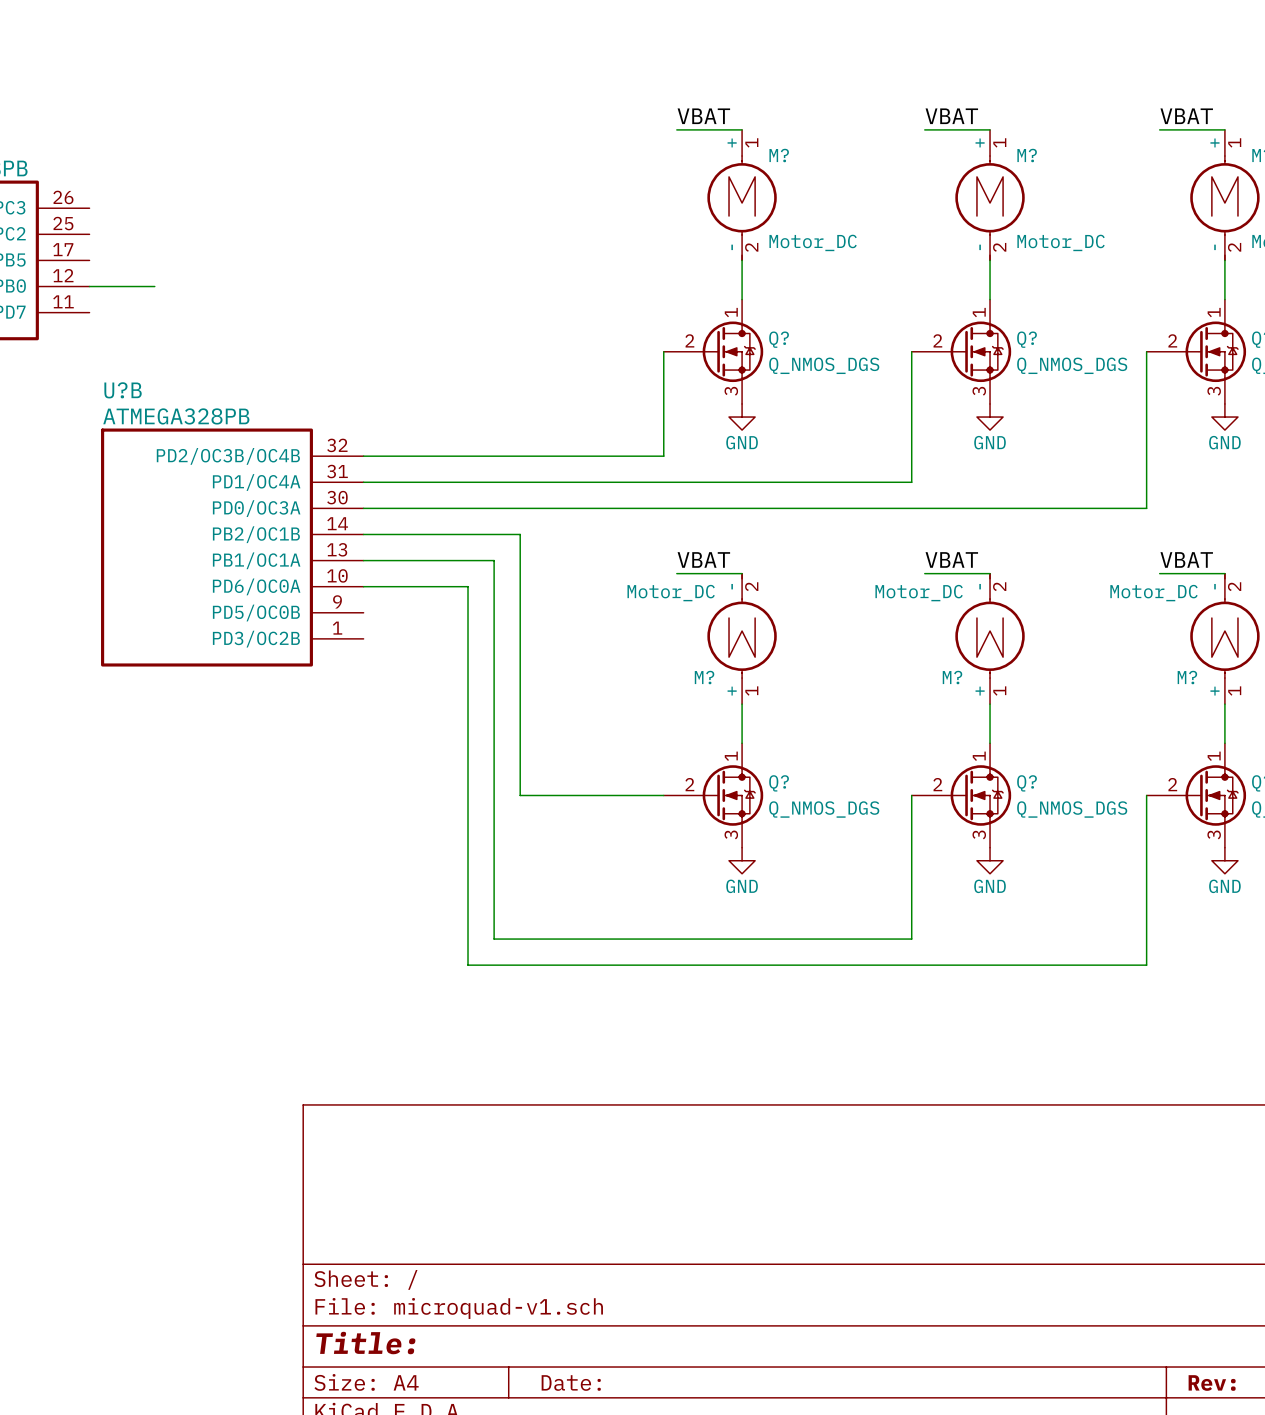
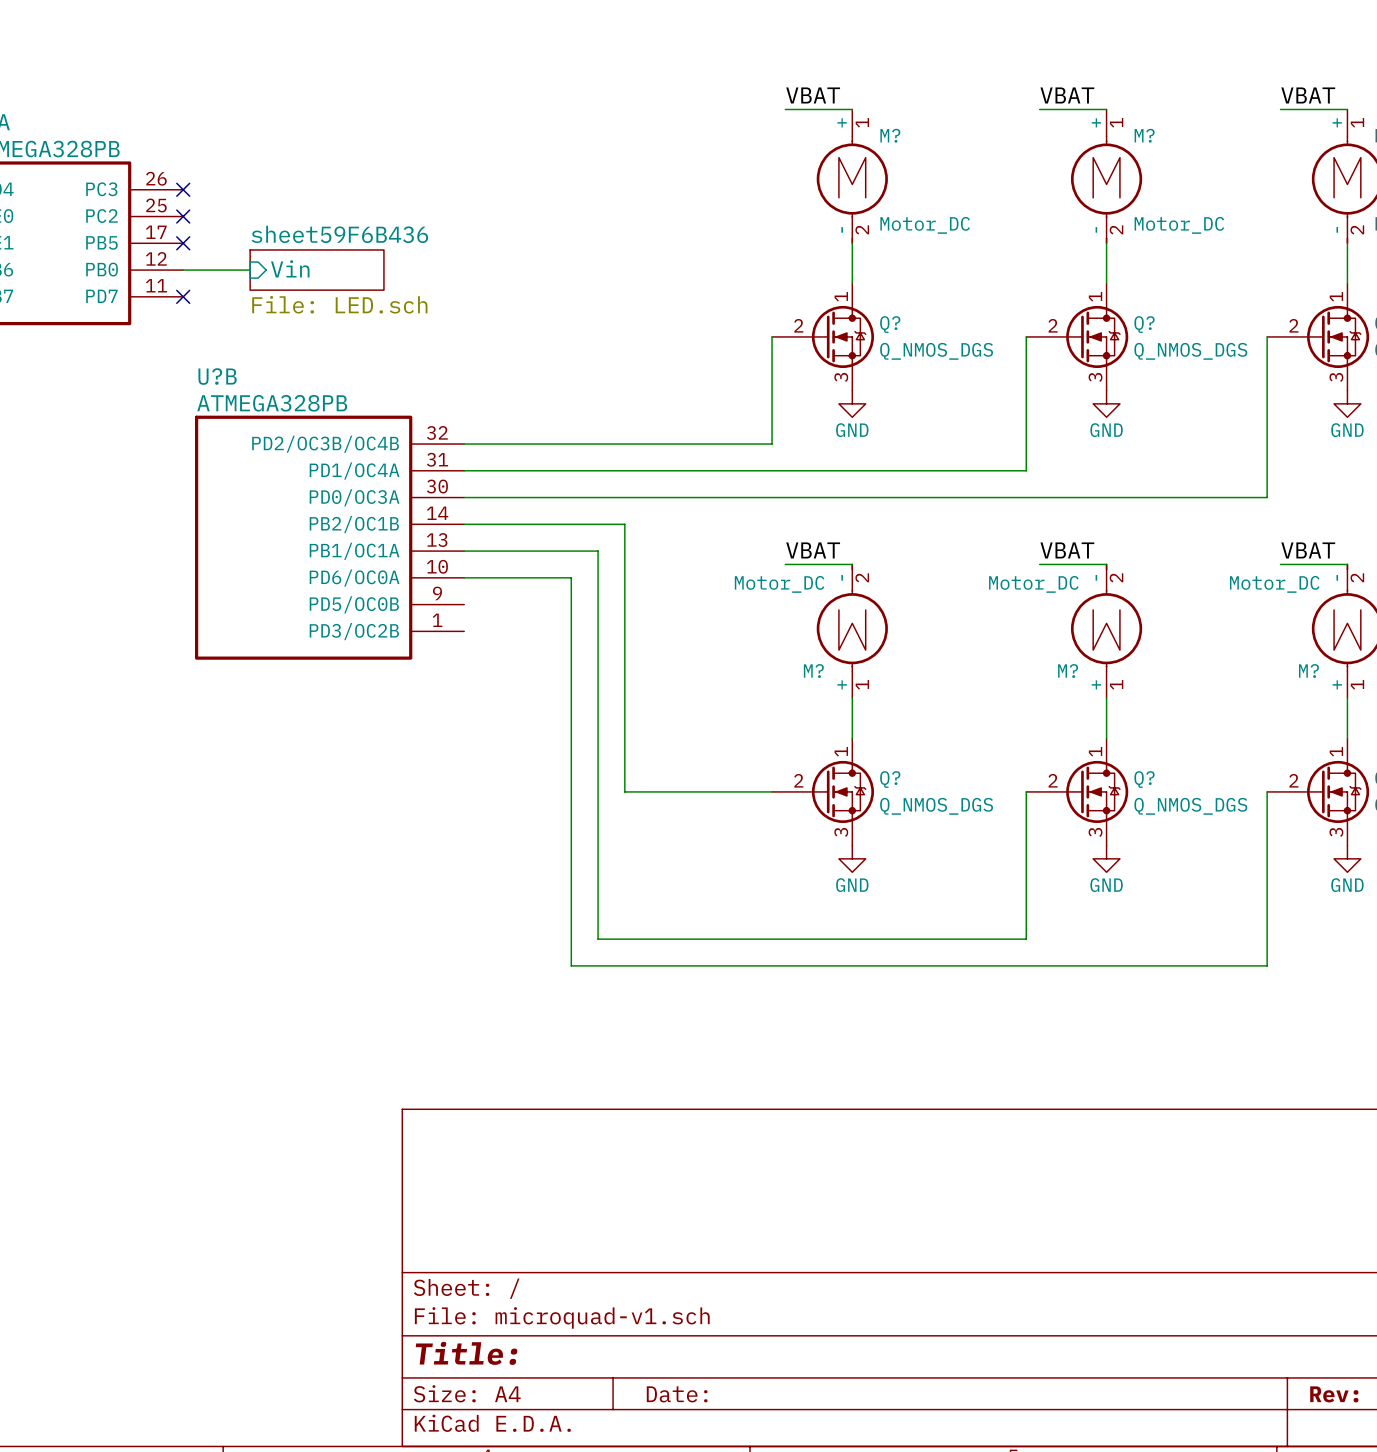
no-connect mark: none -> (183, 189)
no-connect mark: none -> (183, 216)
no-connect mark: none -> (183, 243)
sheet pin: none -> Vin (290, 268)
sheet sheet59F6B436: none -> File: LED.sch (317, 270)
no-connect mark: none -> (183, 296)

